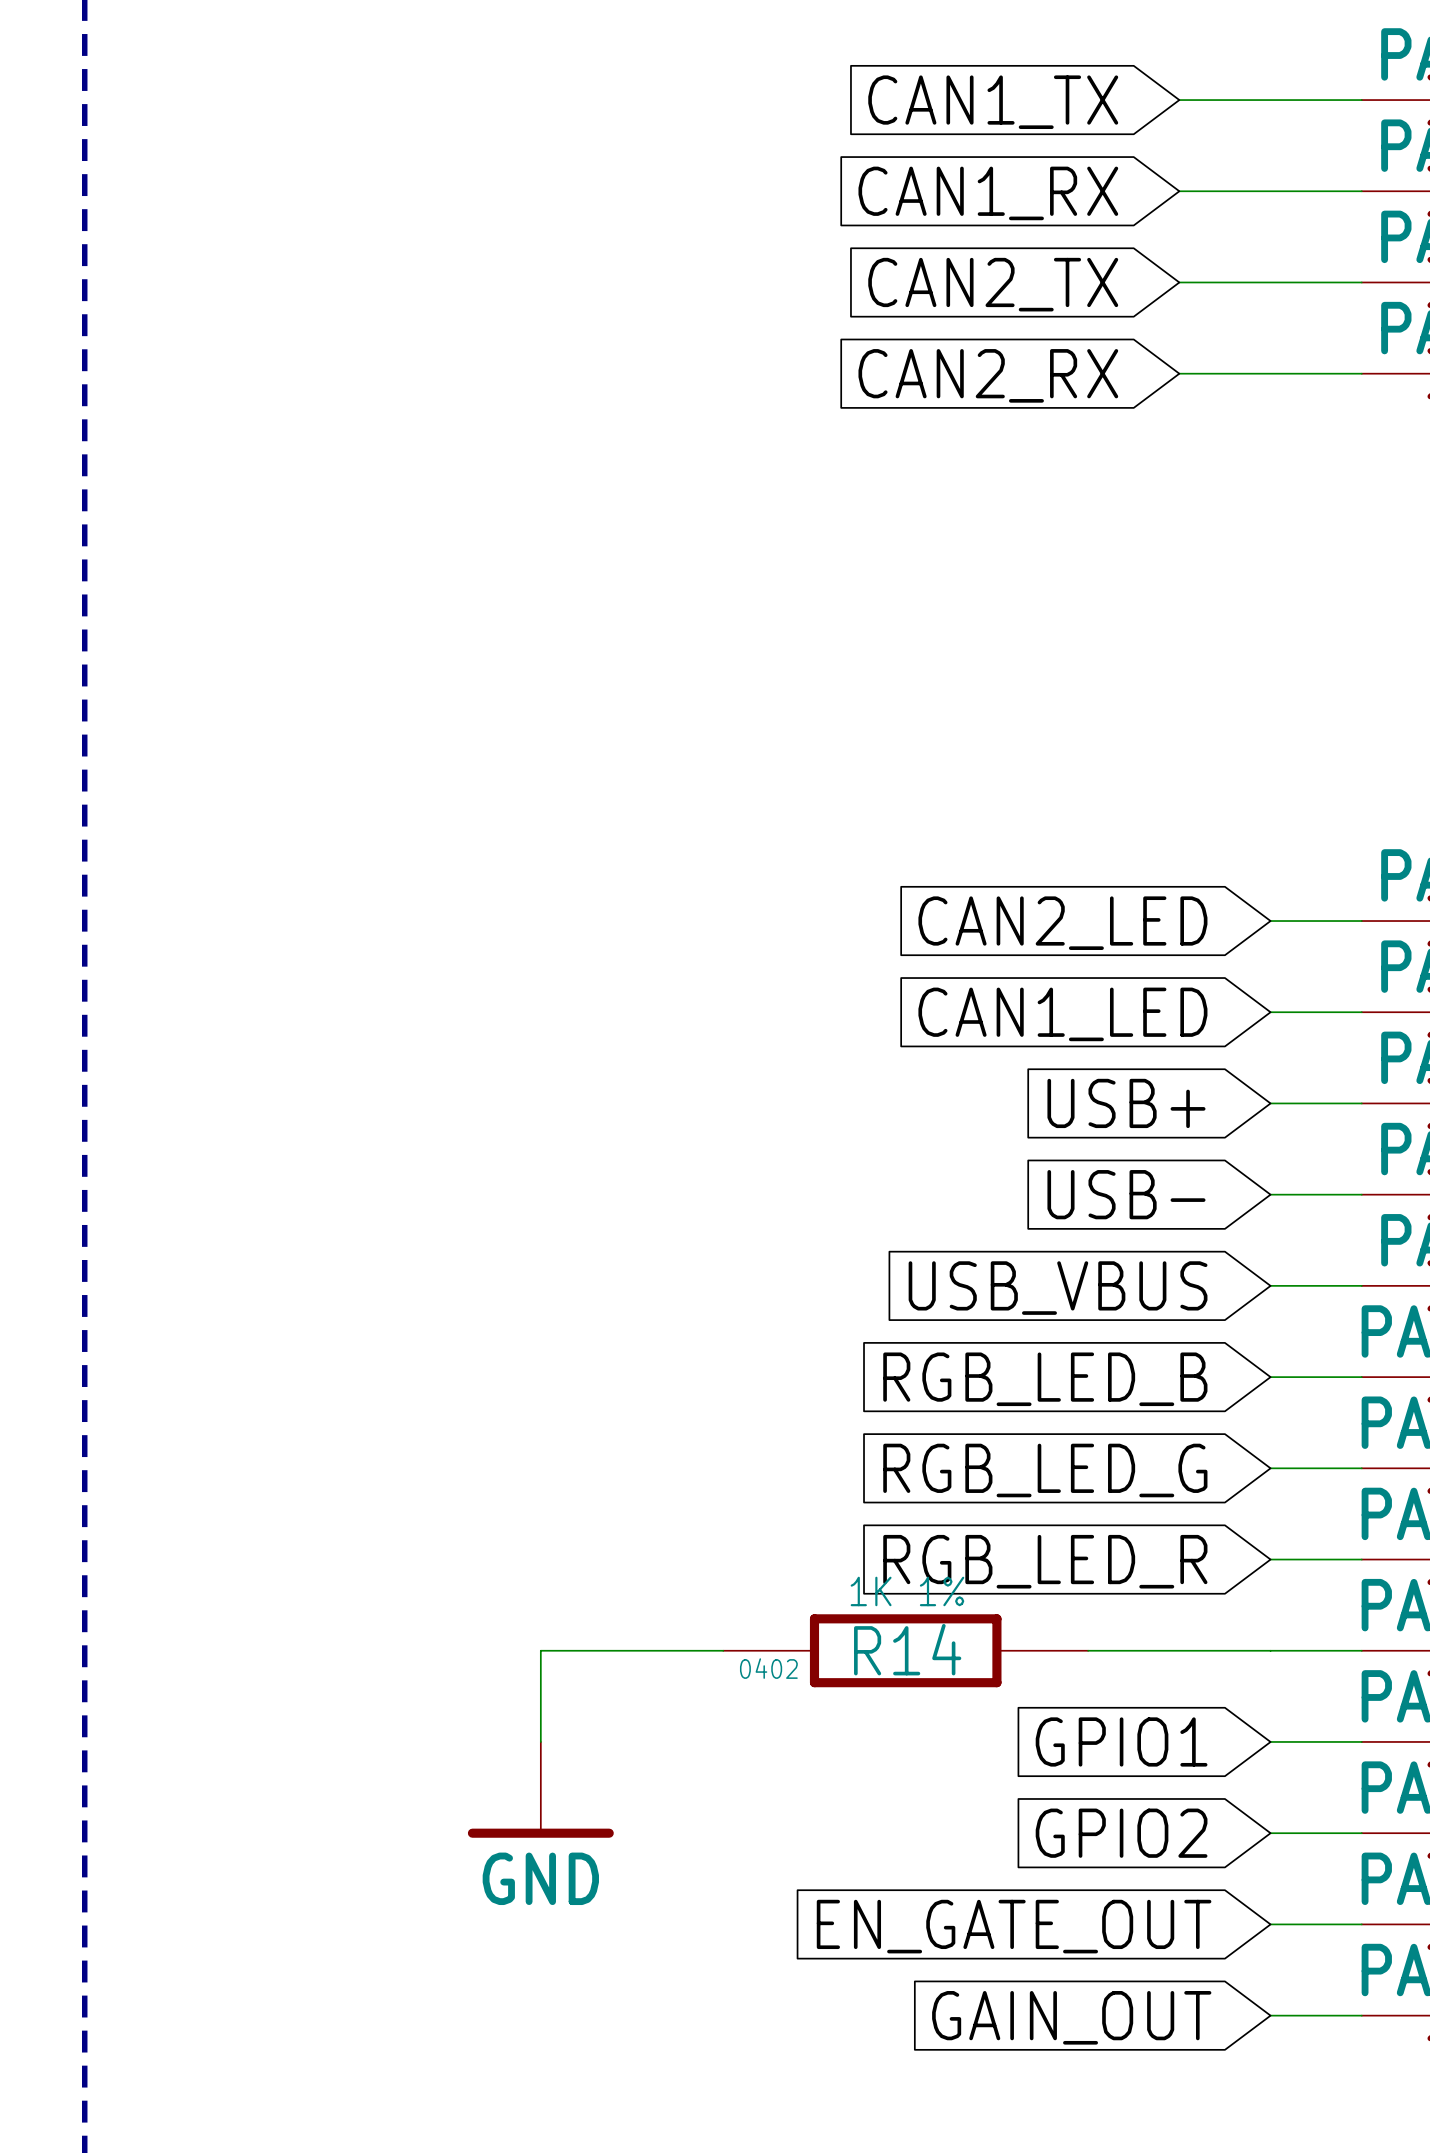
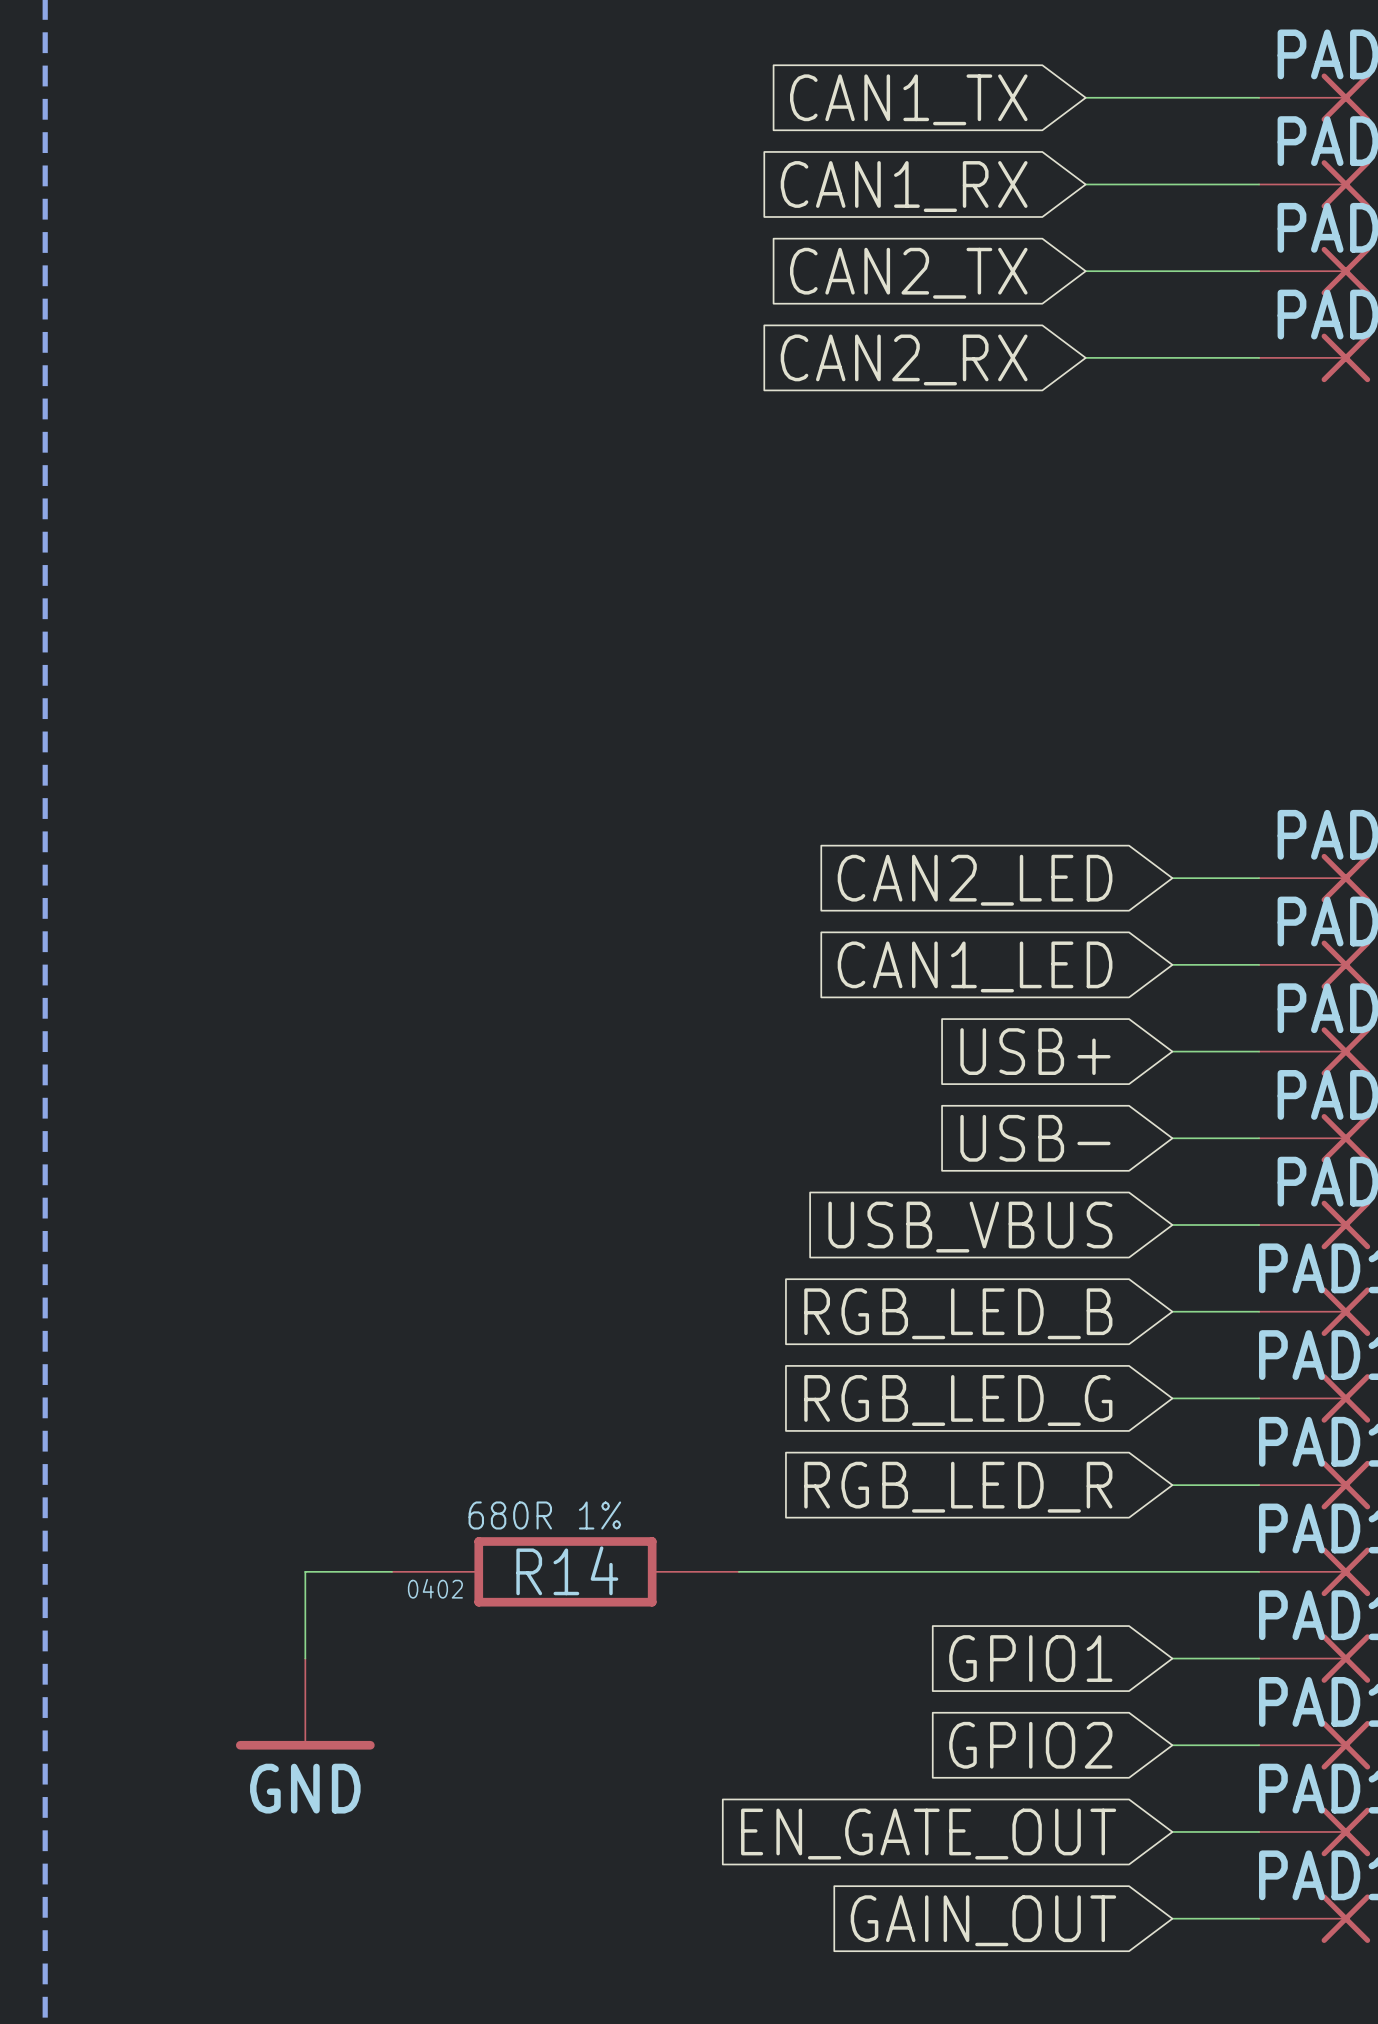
R14 value: 1K (871, 1591) -> 680R (510, 1515)
wire: none -> (392, 1571) (305, 1571) (305, 1658)
wire: (723, 1650) (540, 1650) (540, 1741) -> none
wire: none -> (738, 1571) (999, 1571)
R14 position: (905, 1650) -> (565, 1571)
power symbol position: GND (540, 1789) -> GND (305, 1704)

